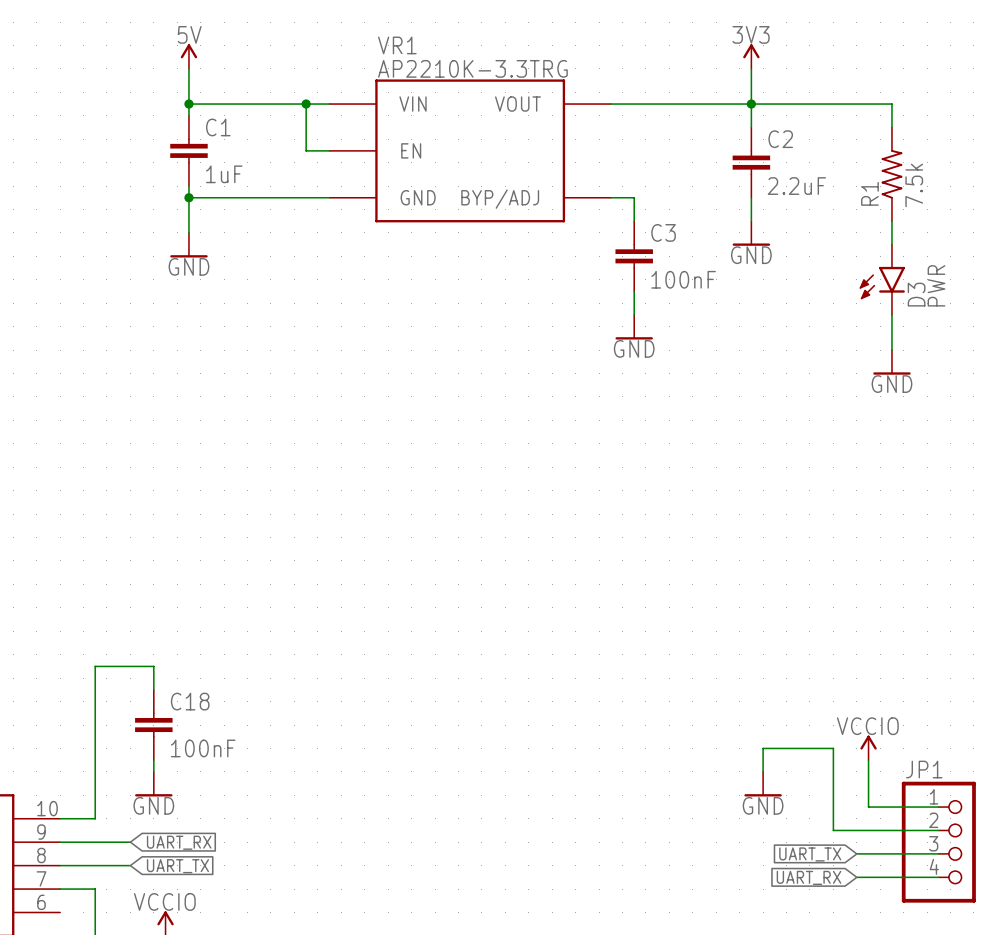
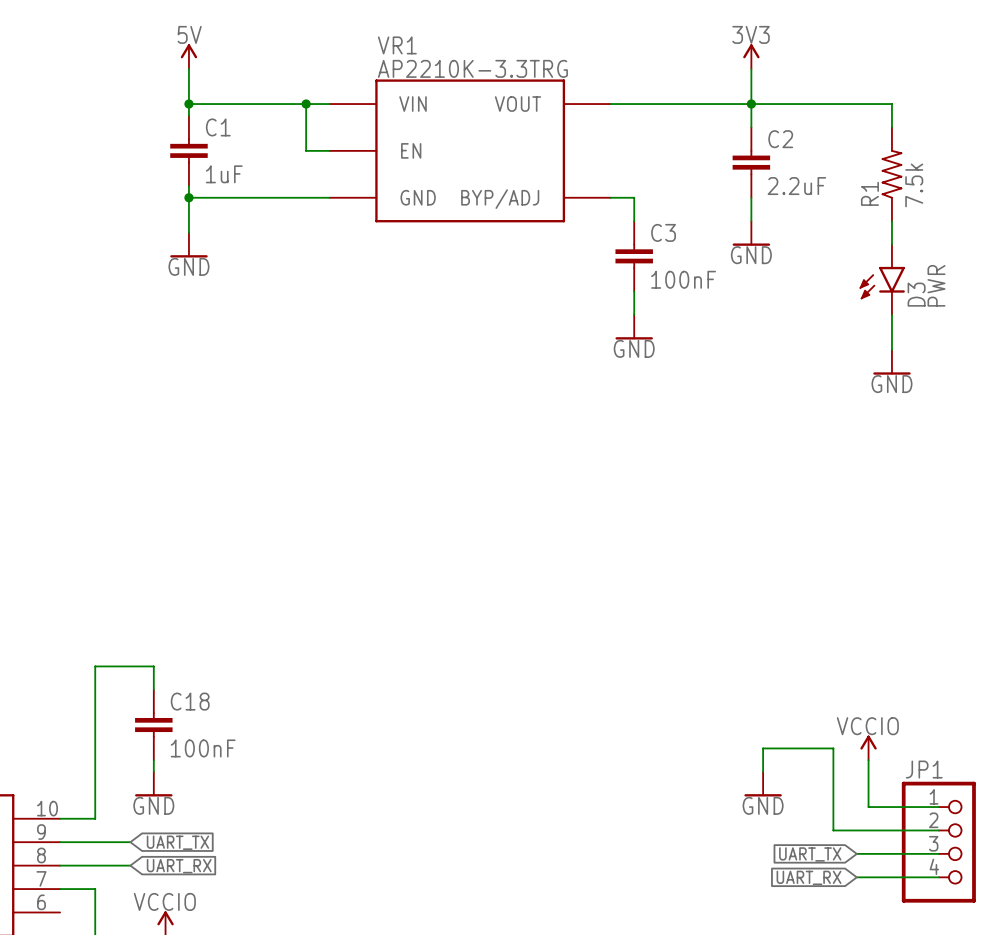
global label: UART_RX (179, 842) -> UART_TX (177, 842)
global label: UART_TX (177, 866) -> UART_RX (179, 866)

